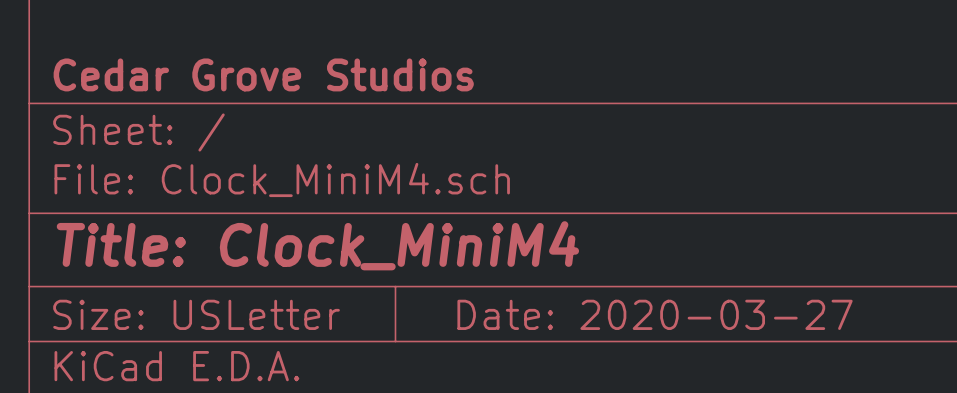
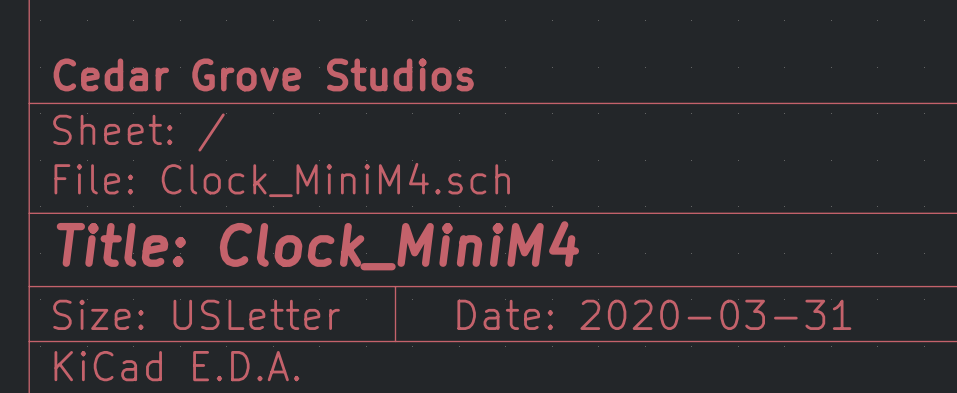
title block: Date: 2020-03-27 (655, 314) -> Date: 2020-03-31 (654, 314)

